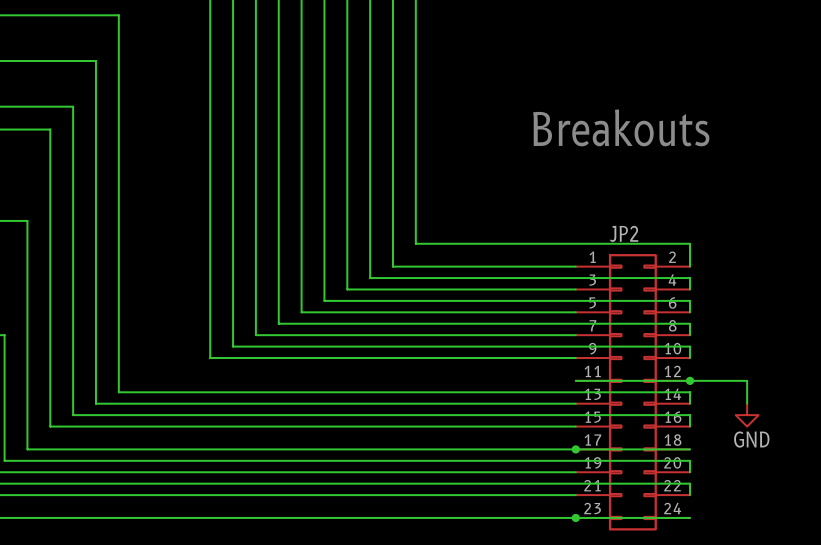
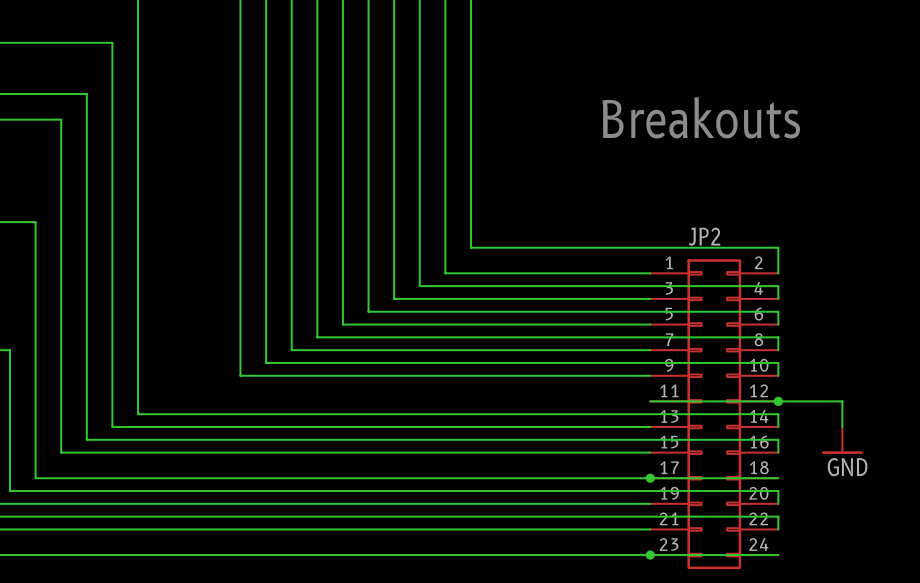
power symbol shape: [735, 403, 759, 427] -> [821, 427, 863, 454]

